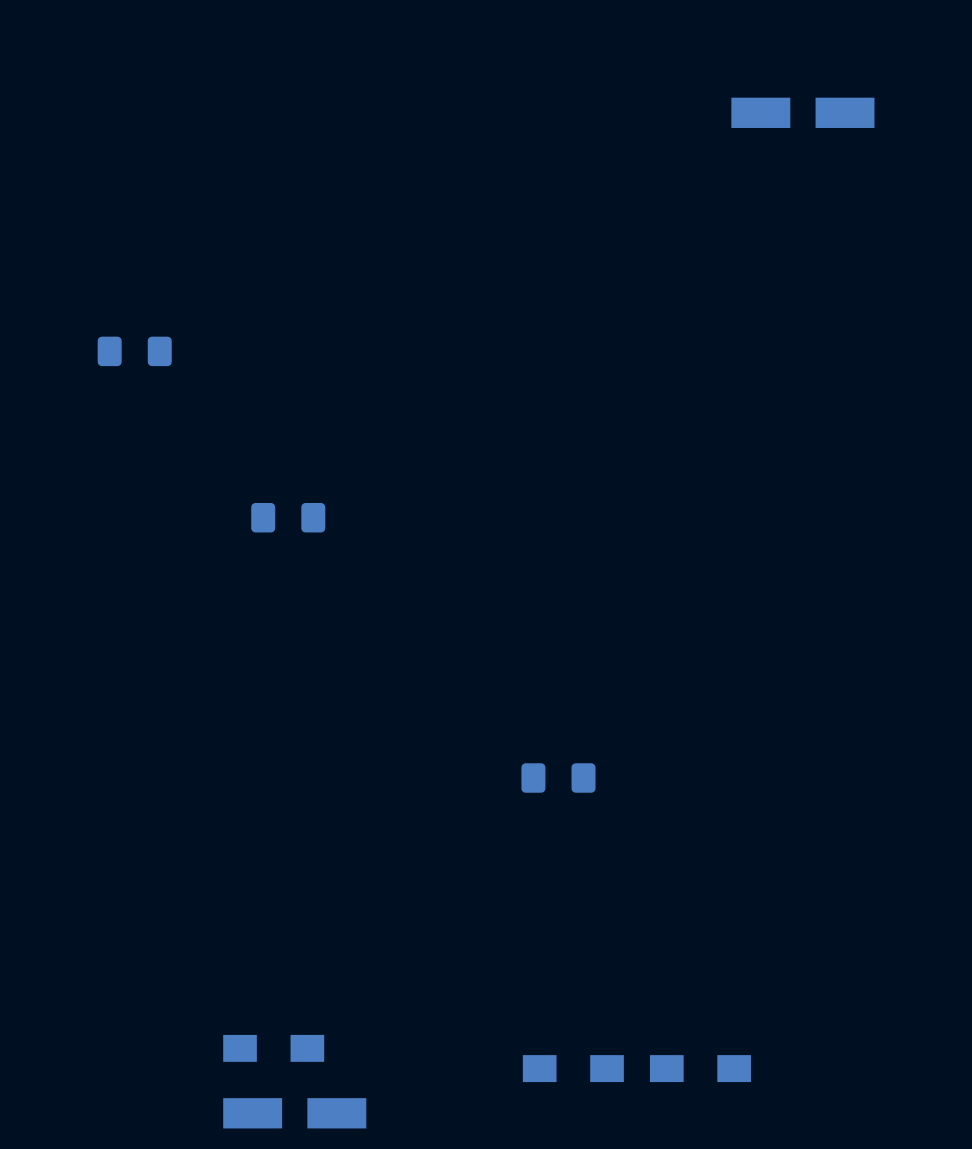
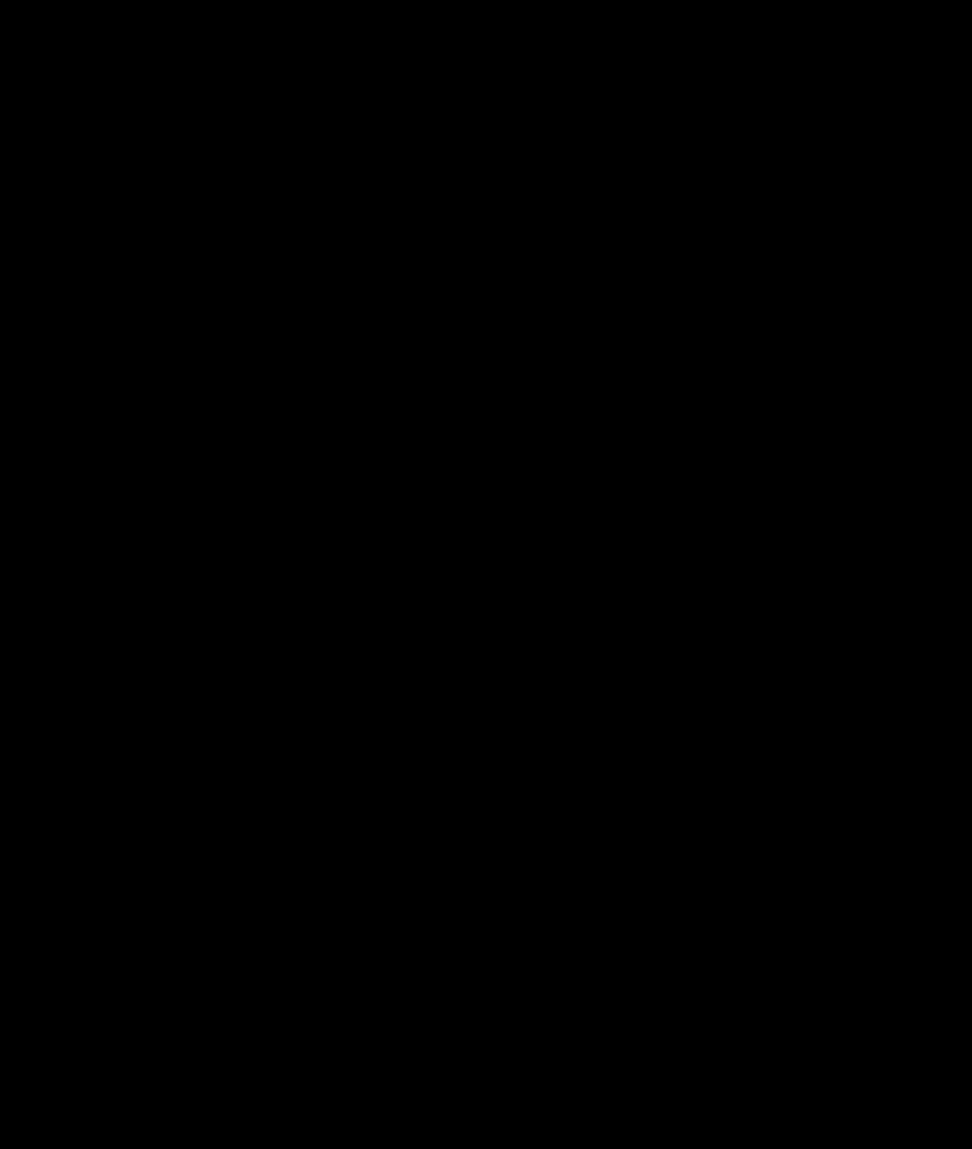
part: (802, 112) -> none
part: (134, 351) -> none
part: (288, 517) -> none
part: (558, 778) -> none
part: (273, 1048) -> none
part: (573, 1068) -> none
part: (700, 1068) -> none
part: (294, 1113) -> none

